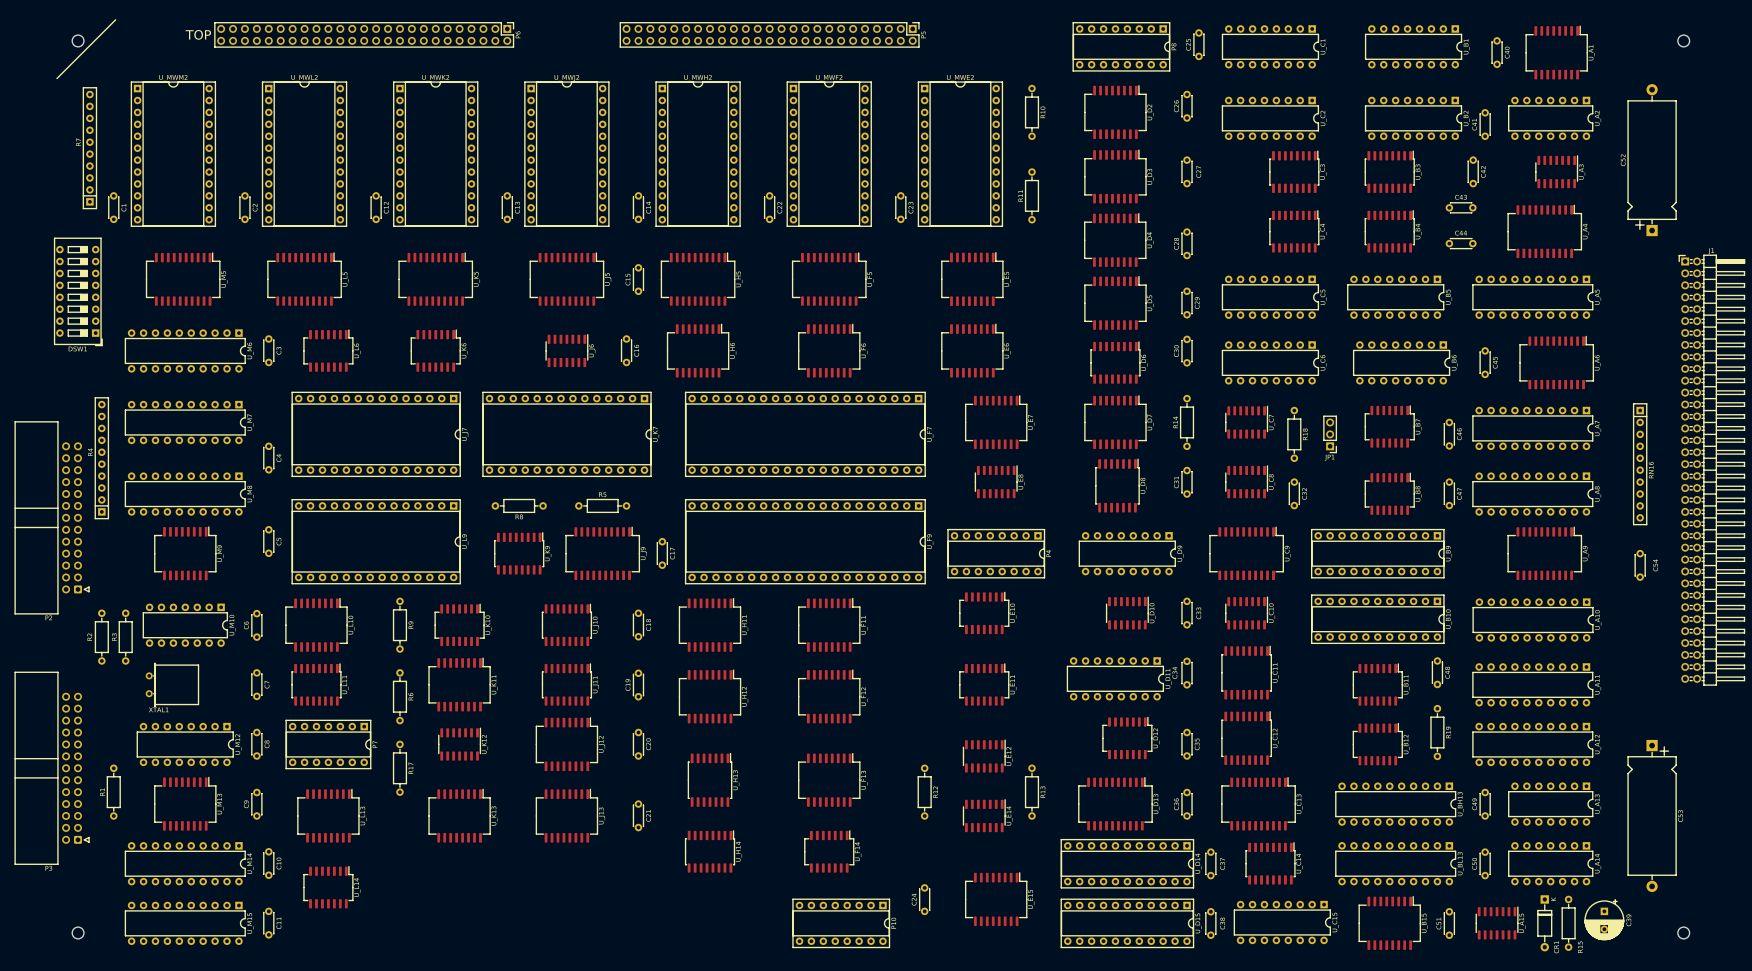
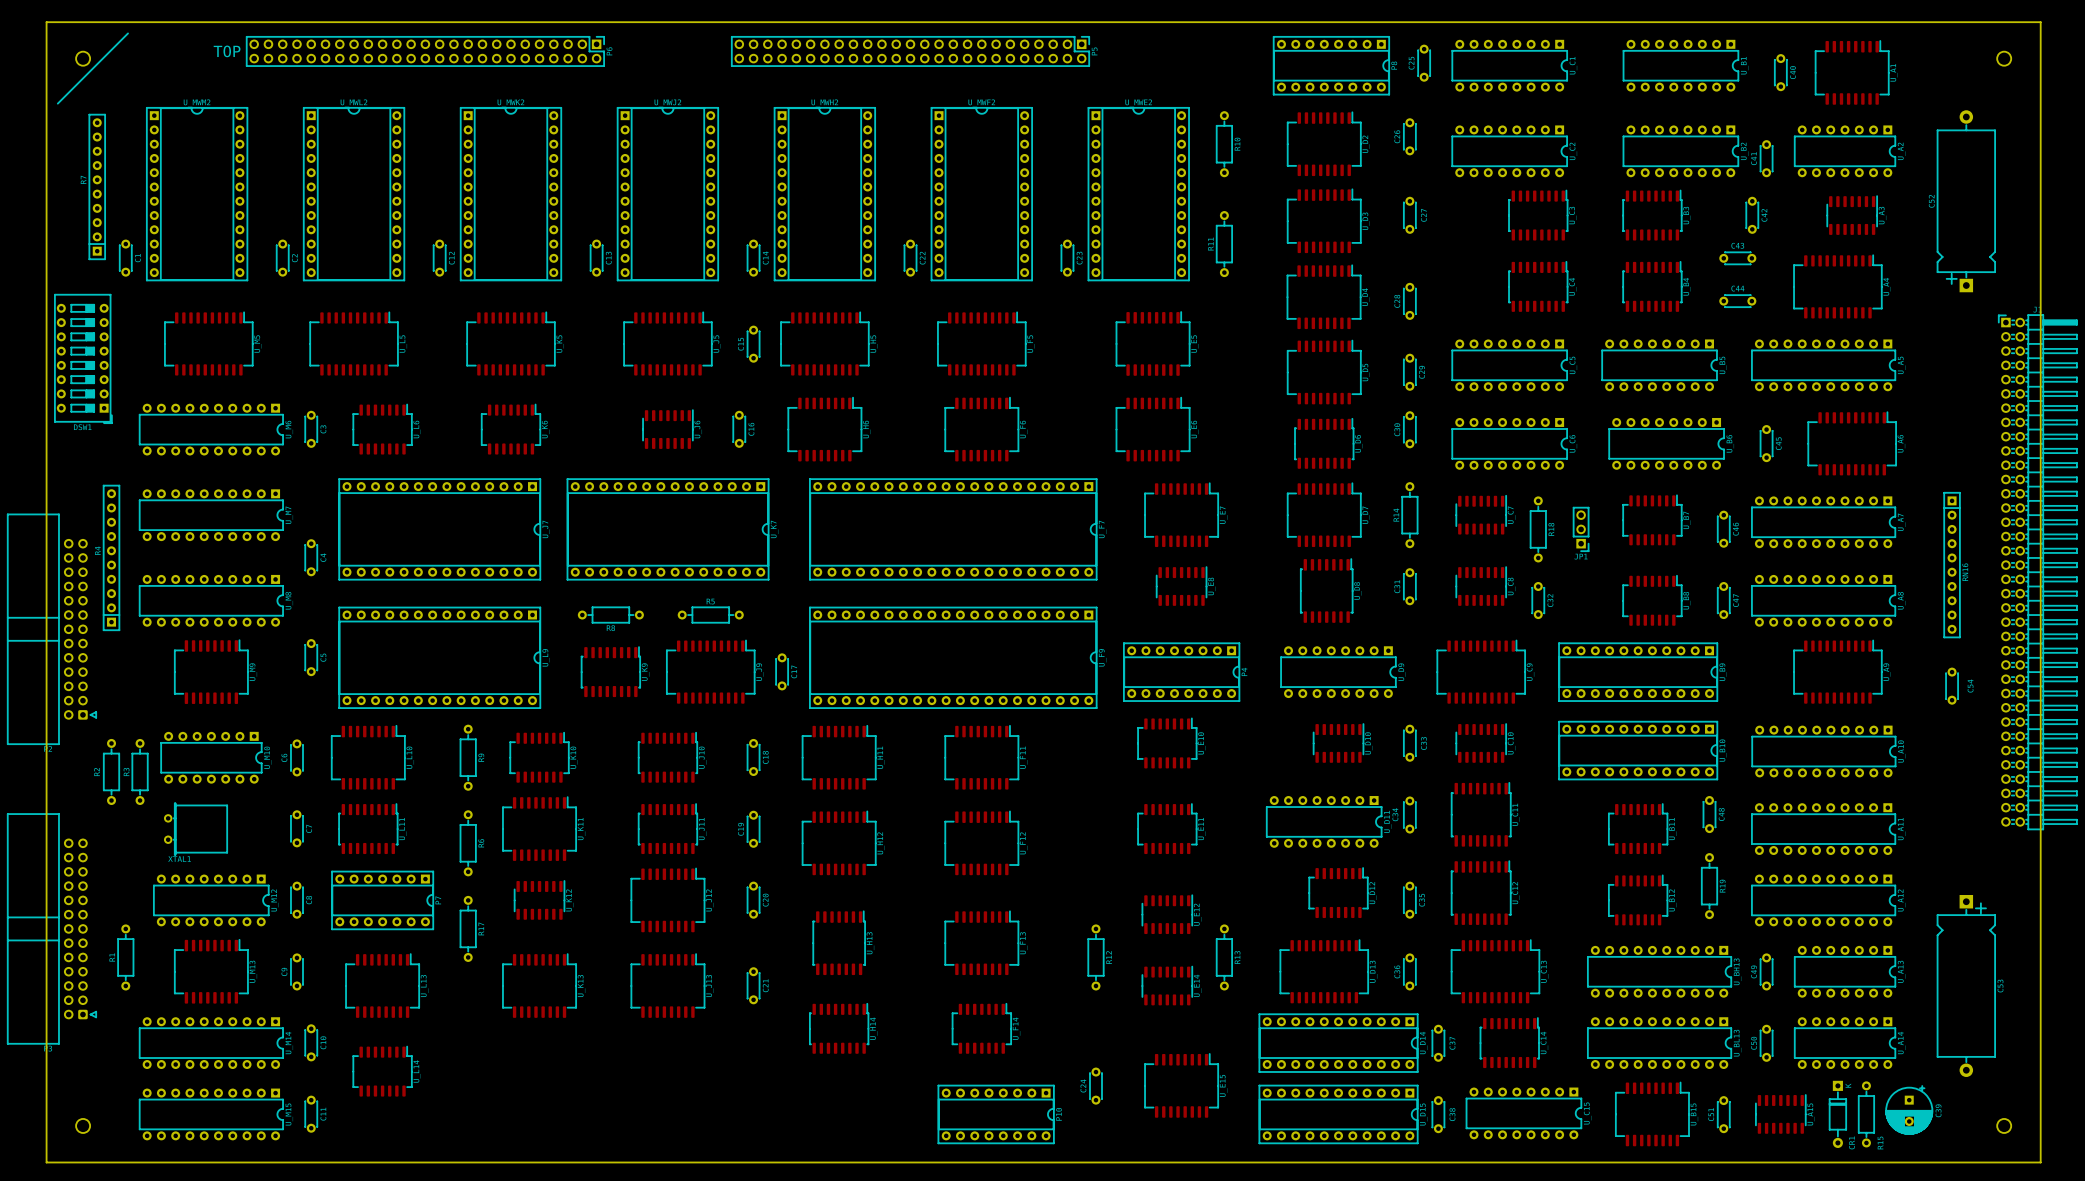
board edge: none -> (46, 22) (2040, 22) (2040, 1162) (46, 1162) (46, 22)

